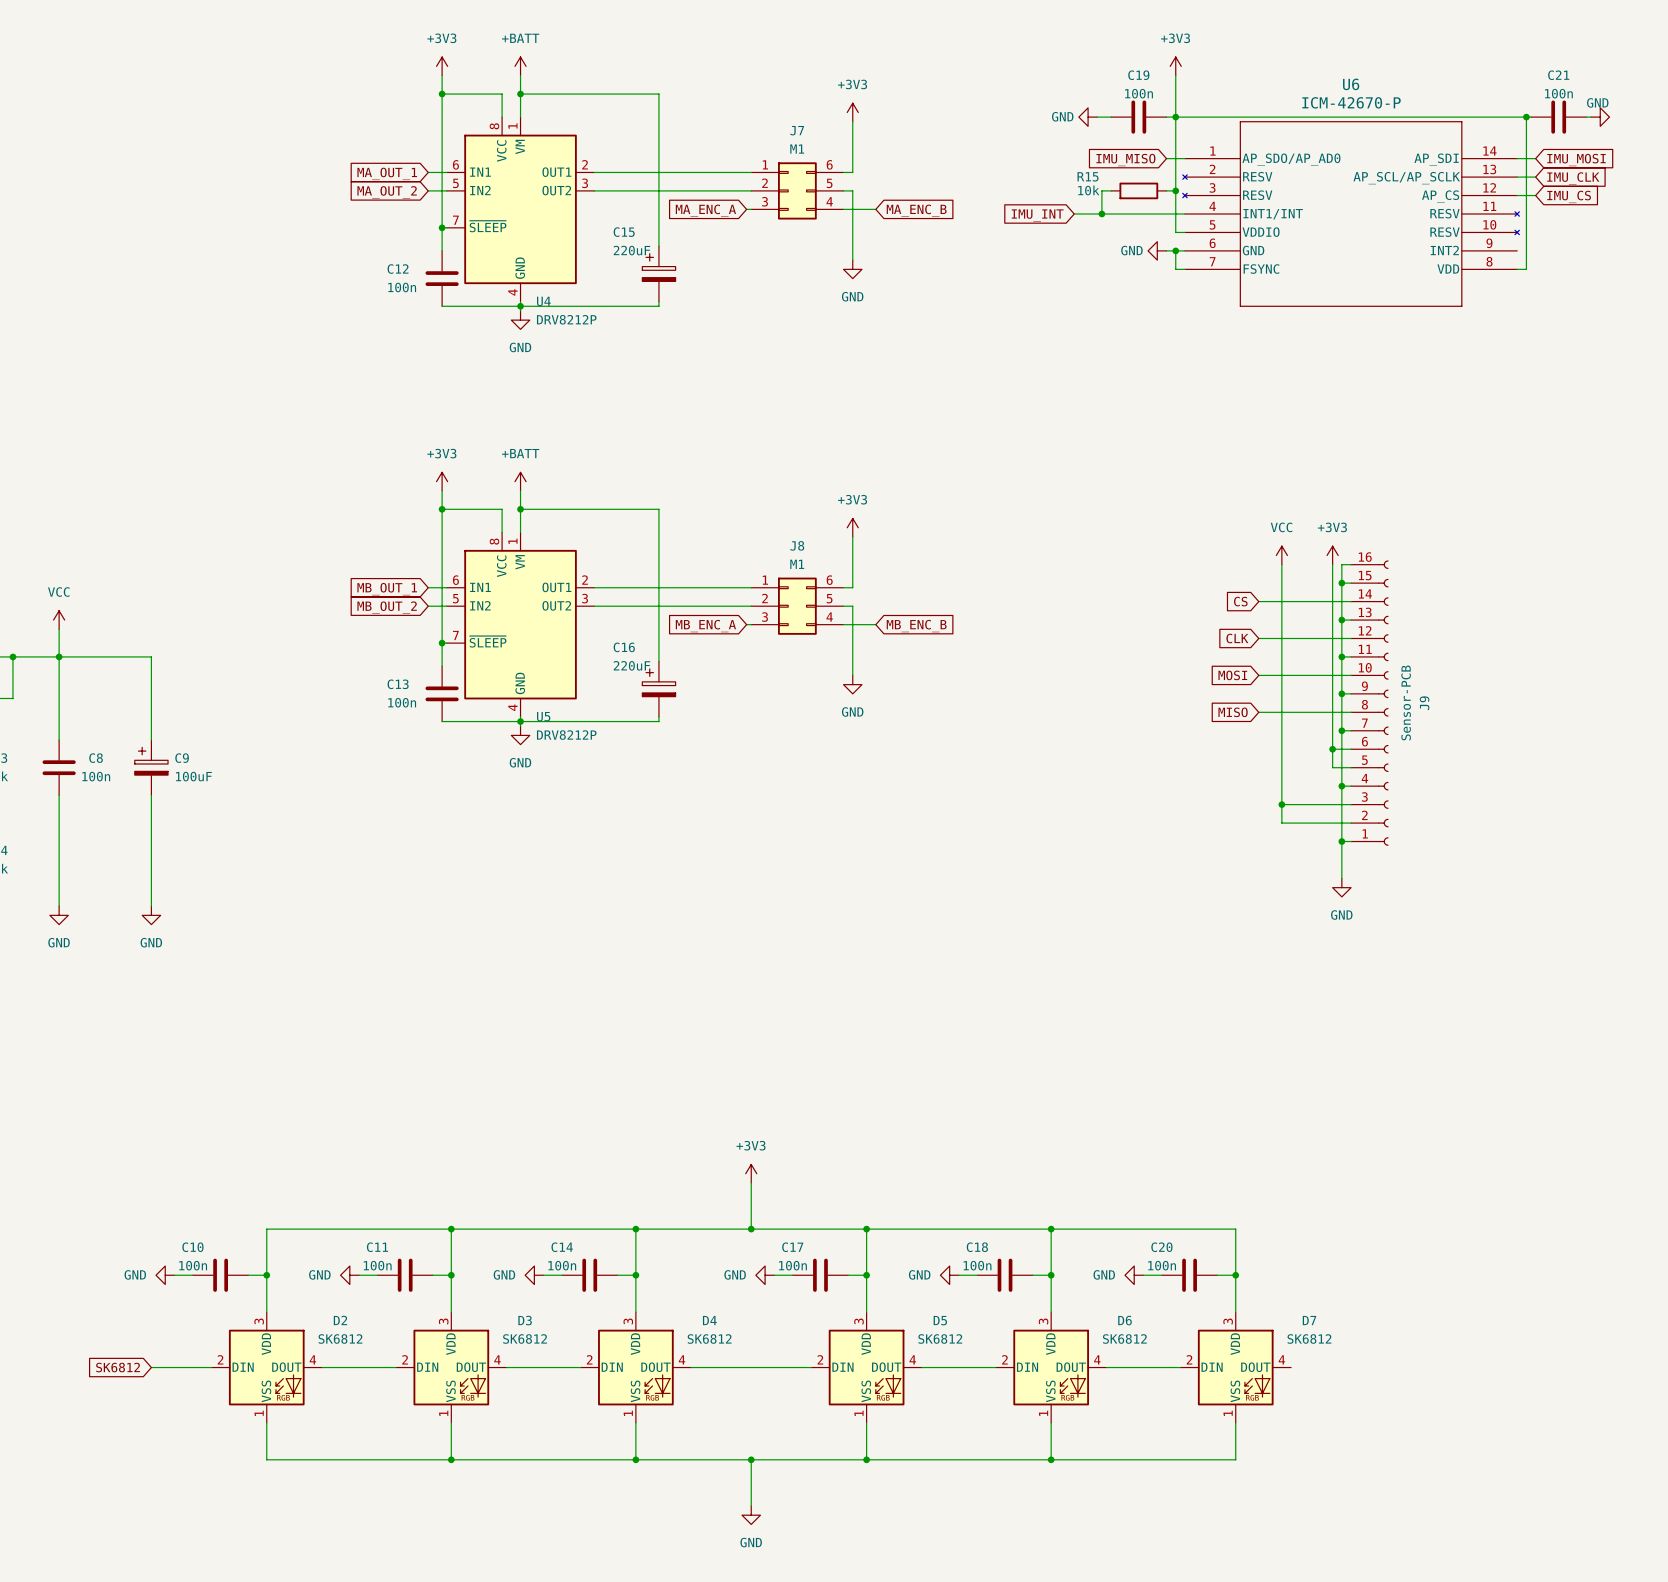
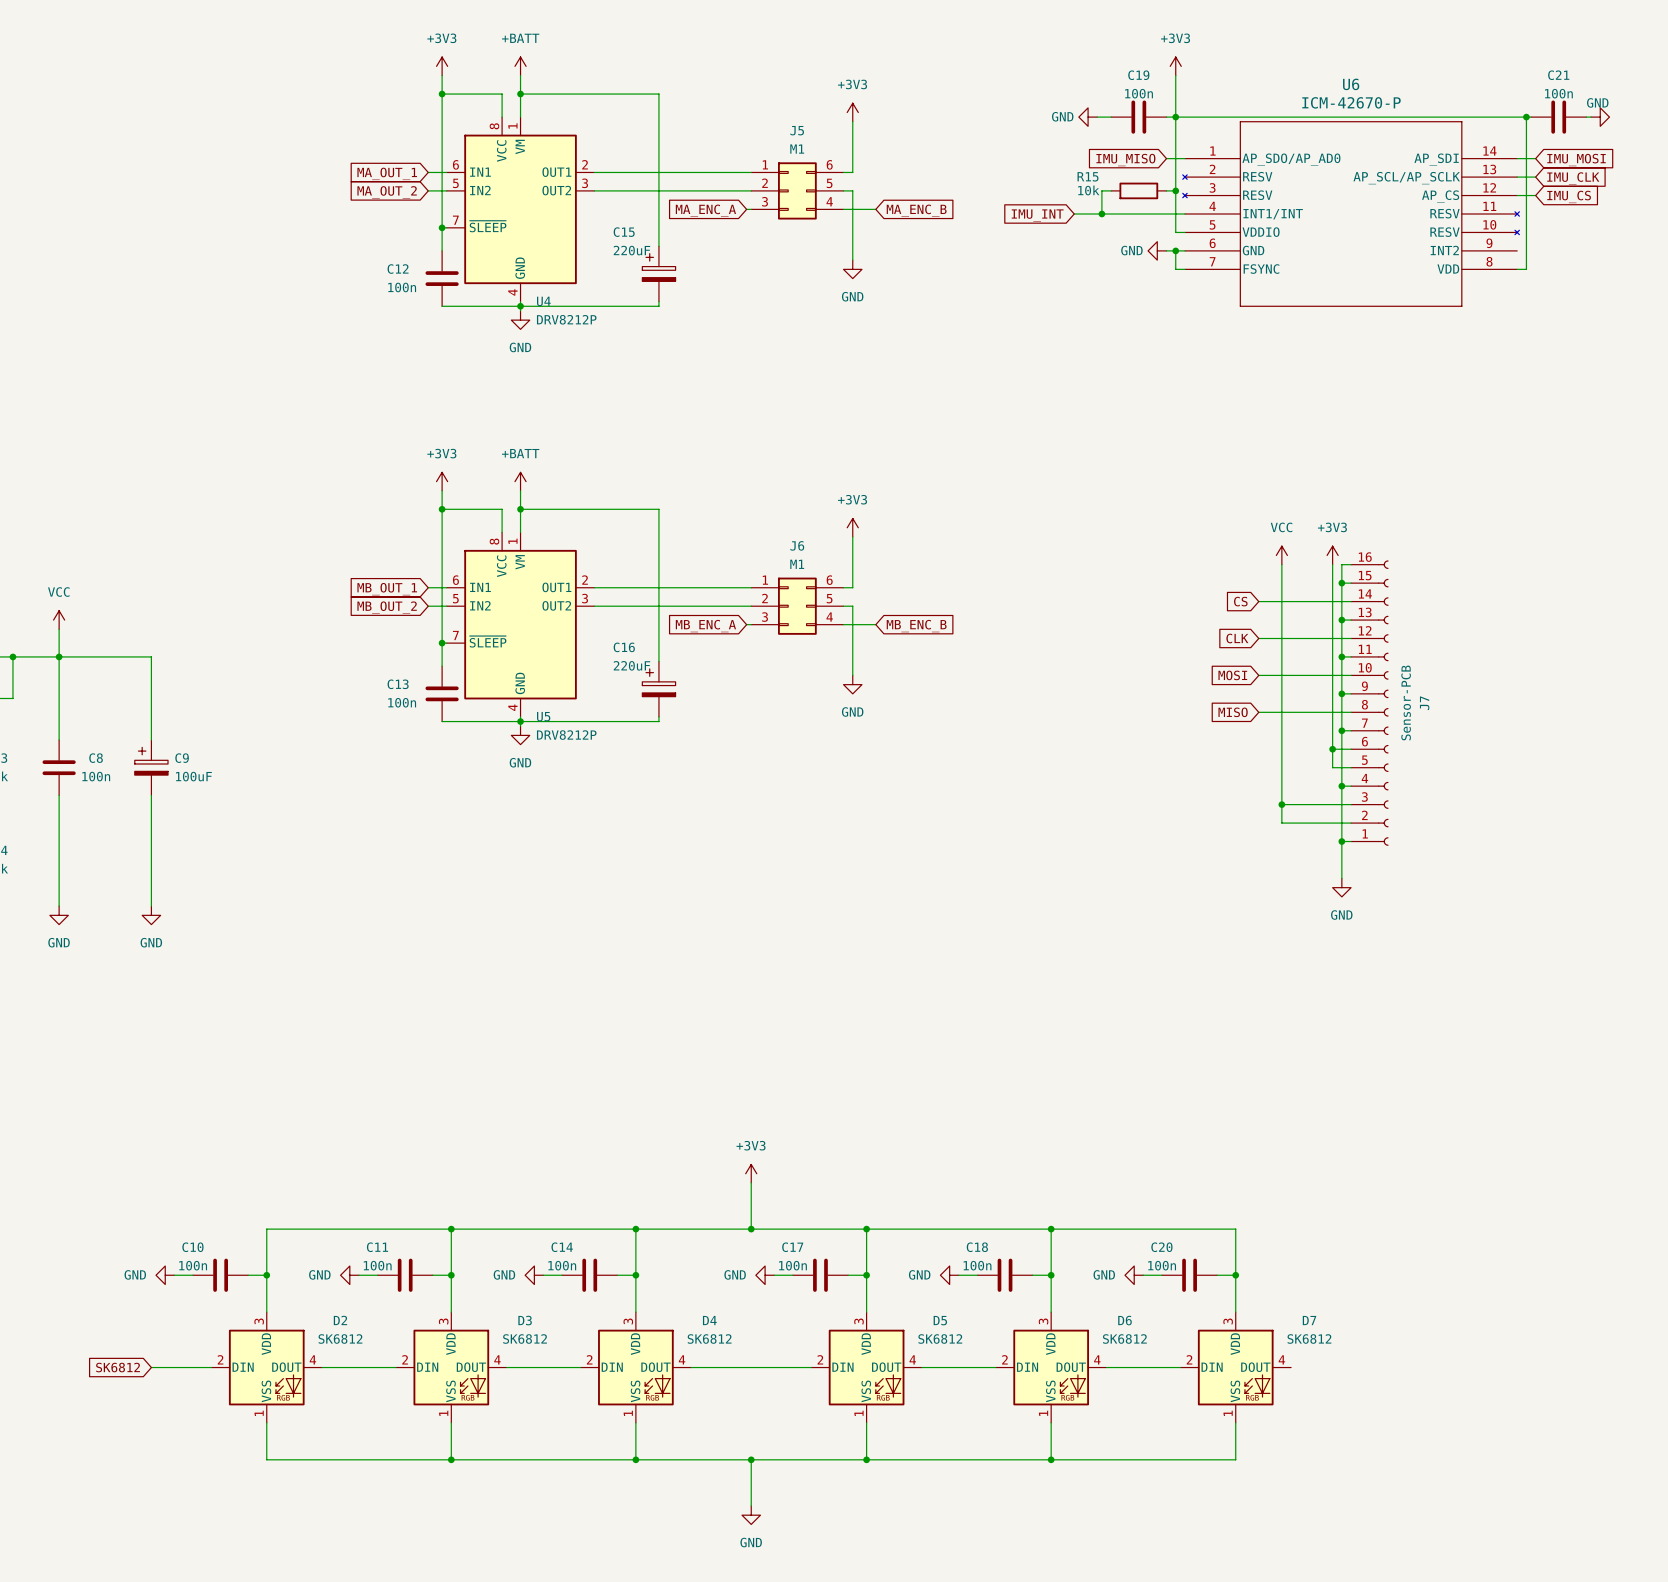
J7 name: J7 (797, 130) -> J5 (797, 130)
J8 name: J8 (797, 545) -> J6 (797, 545)
J9 name: J9 (1424, 703) -> J7 (1424, 703)

